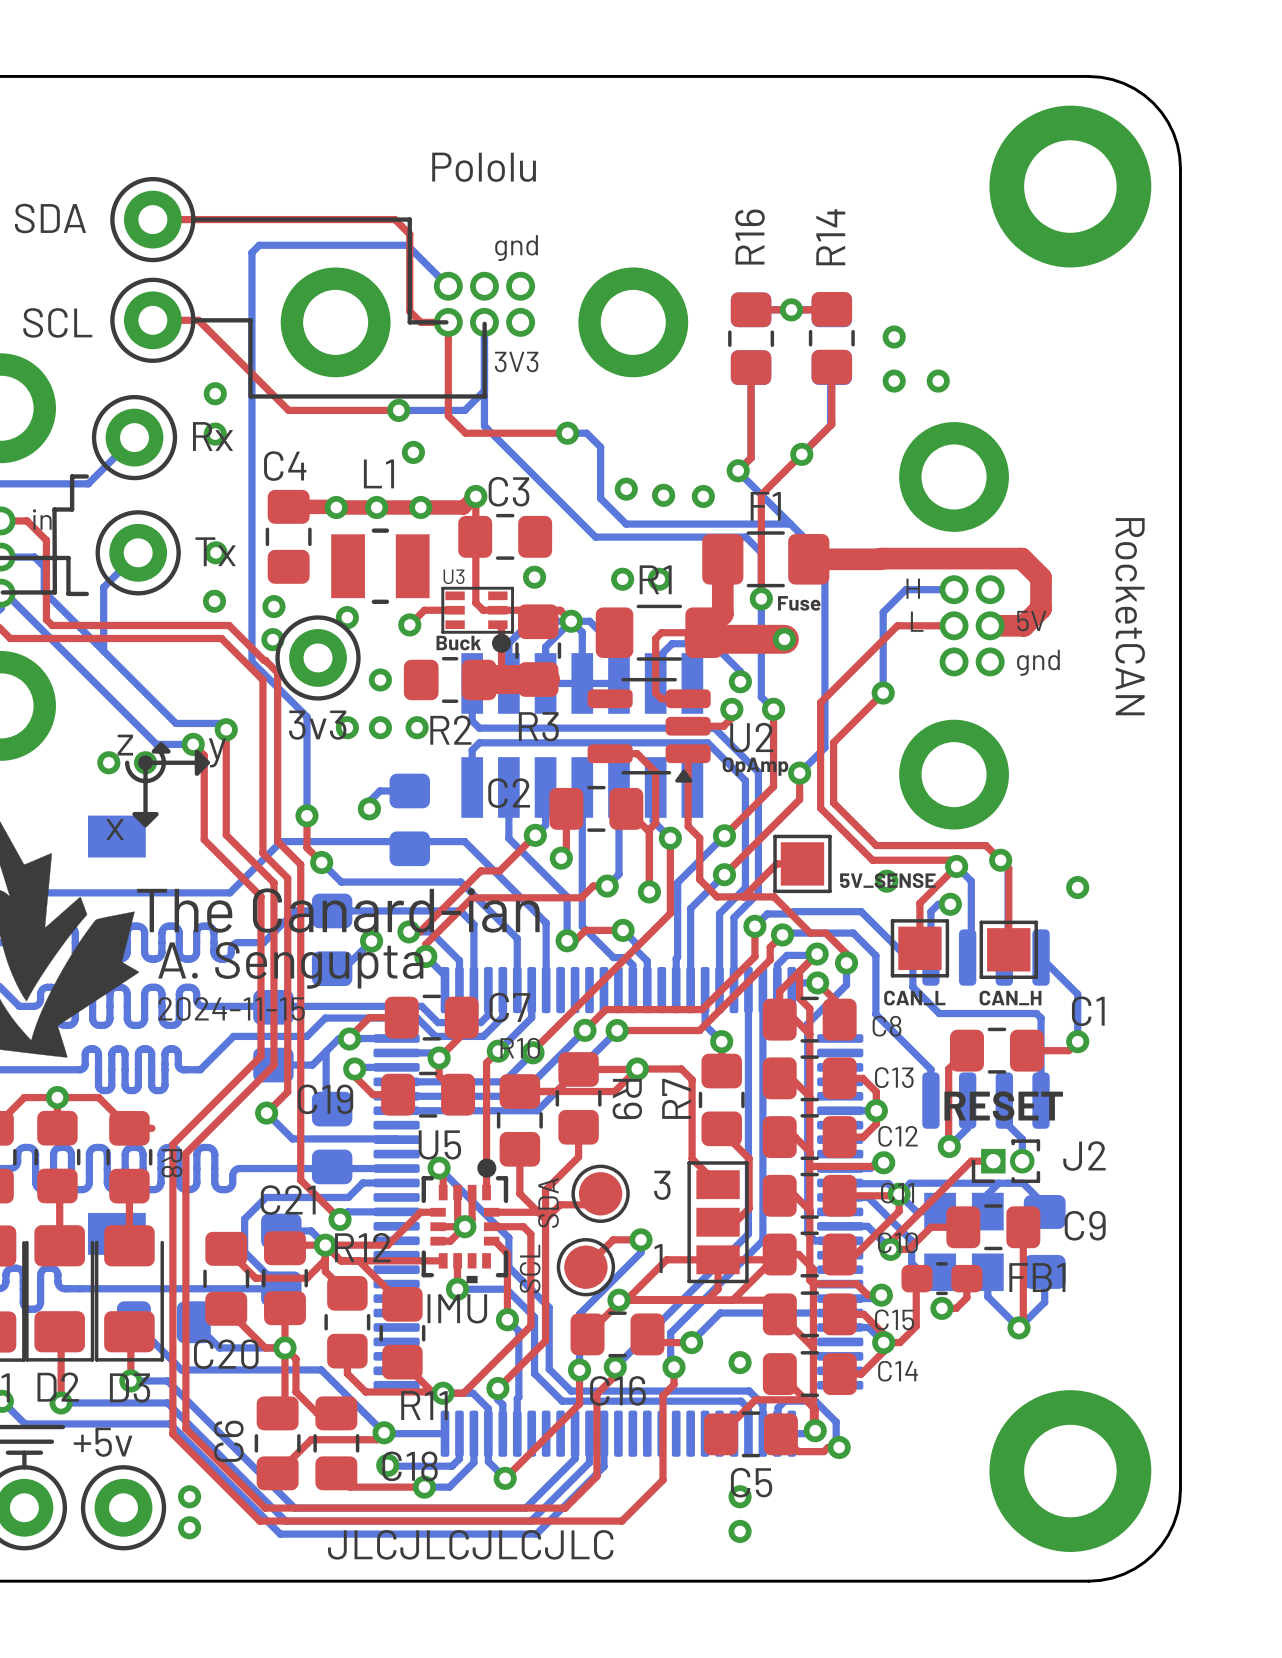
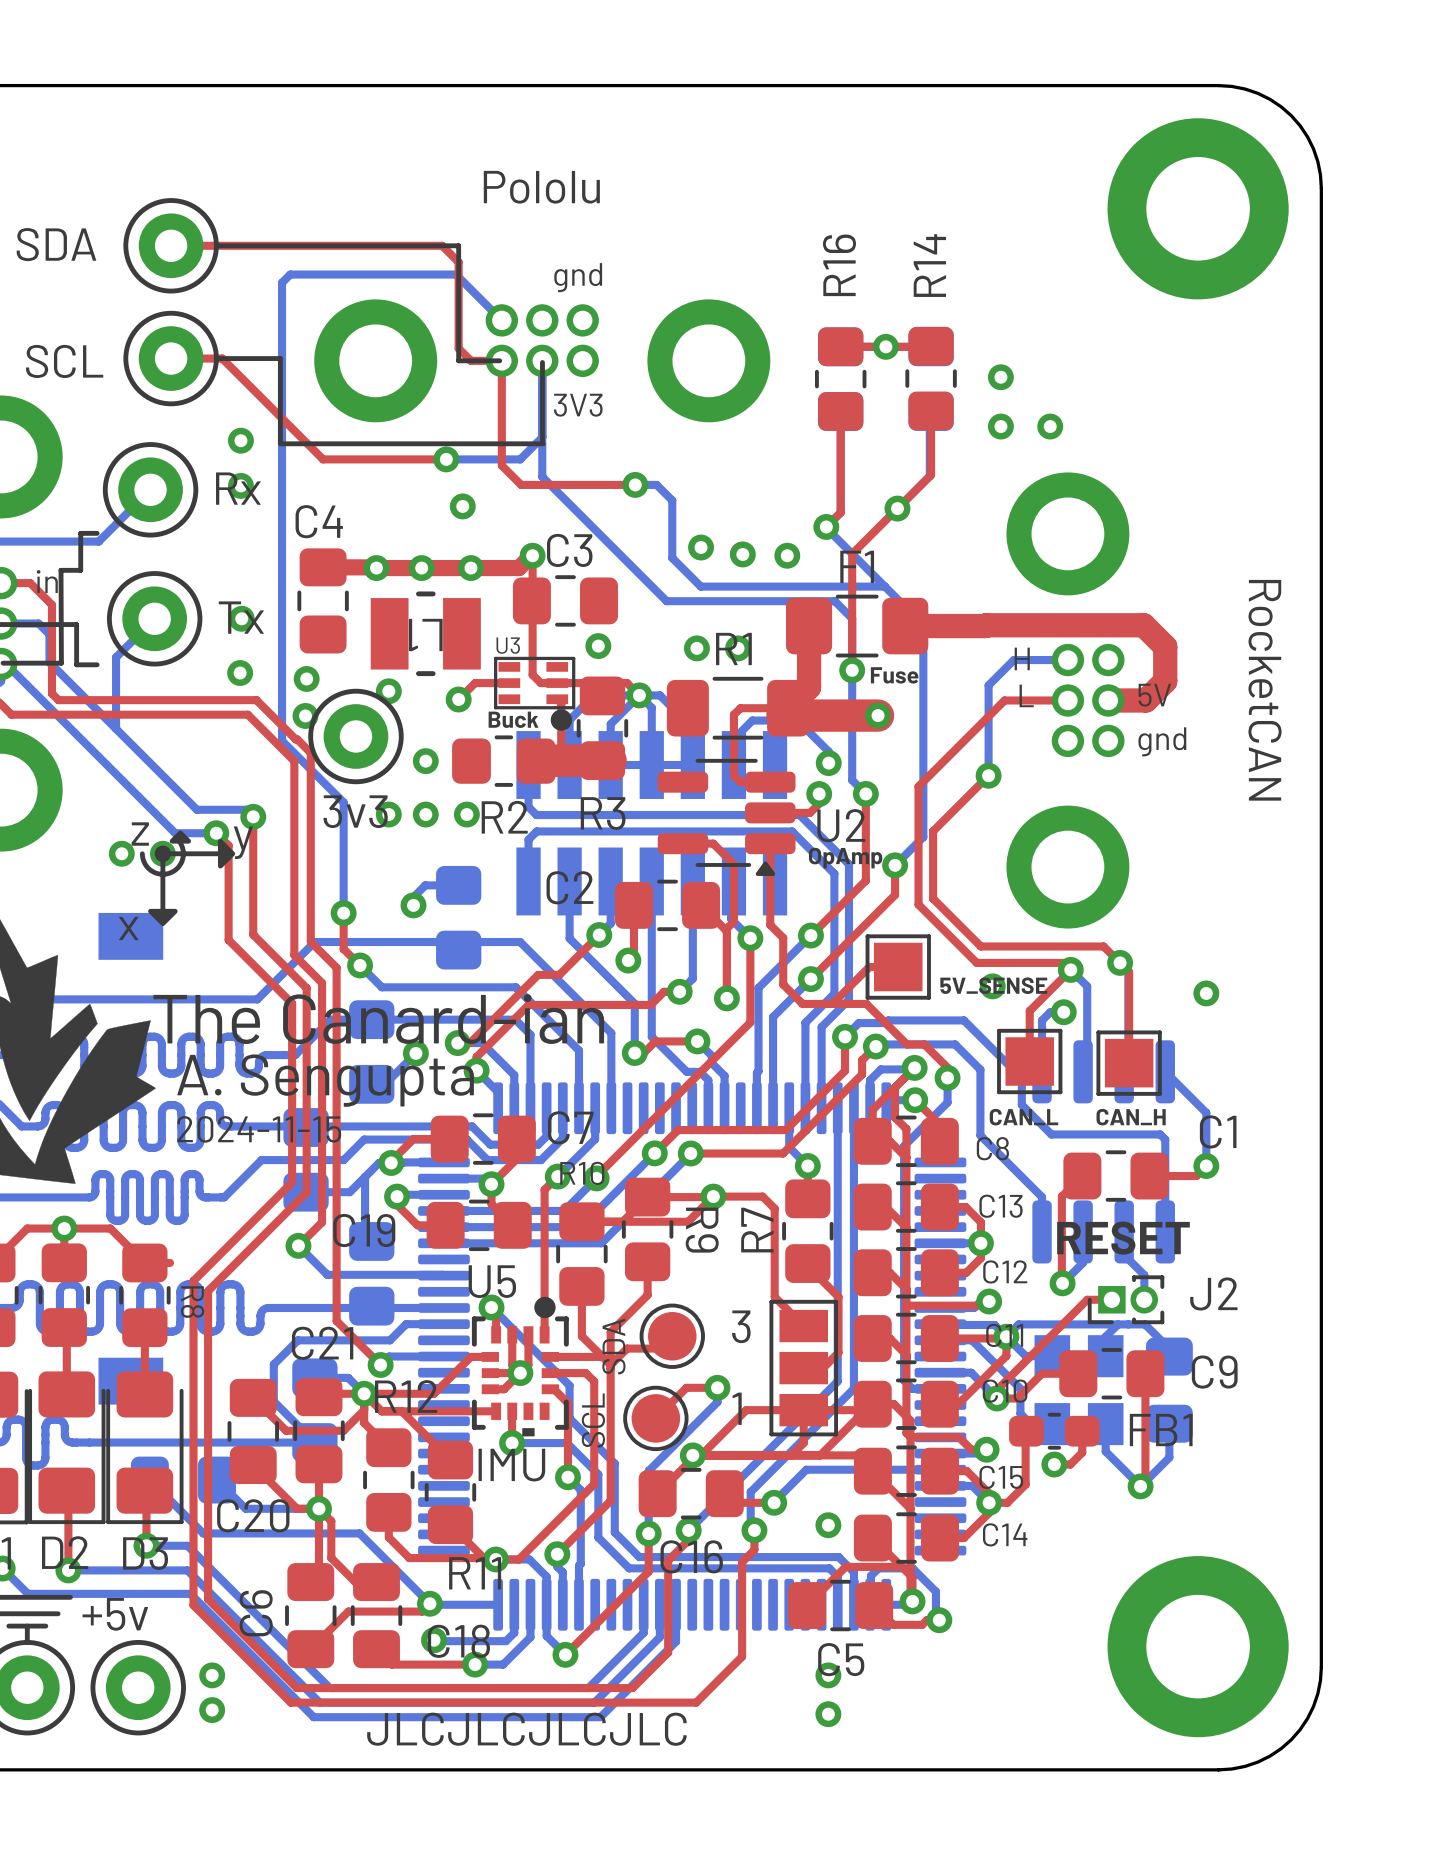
L1 name rotation: 0° (378, 473) -> 180° (425, 634)
L1 name position: L1 (378, 473) -> L1 (425, 634)

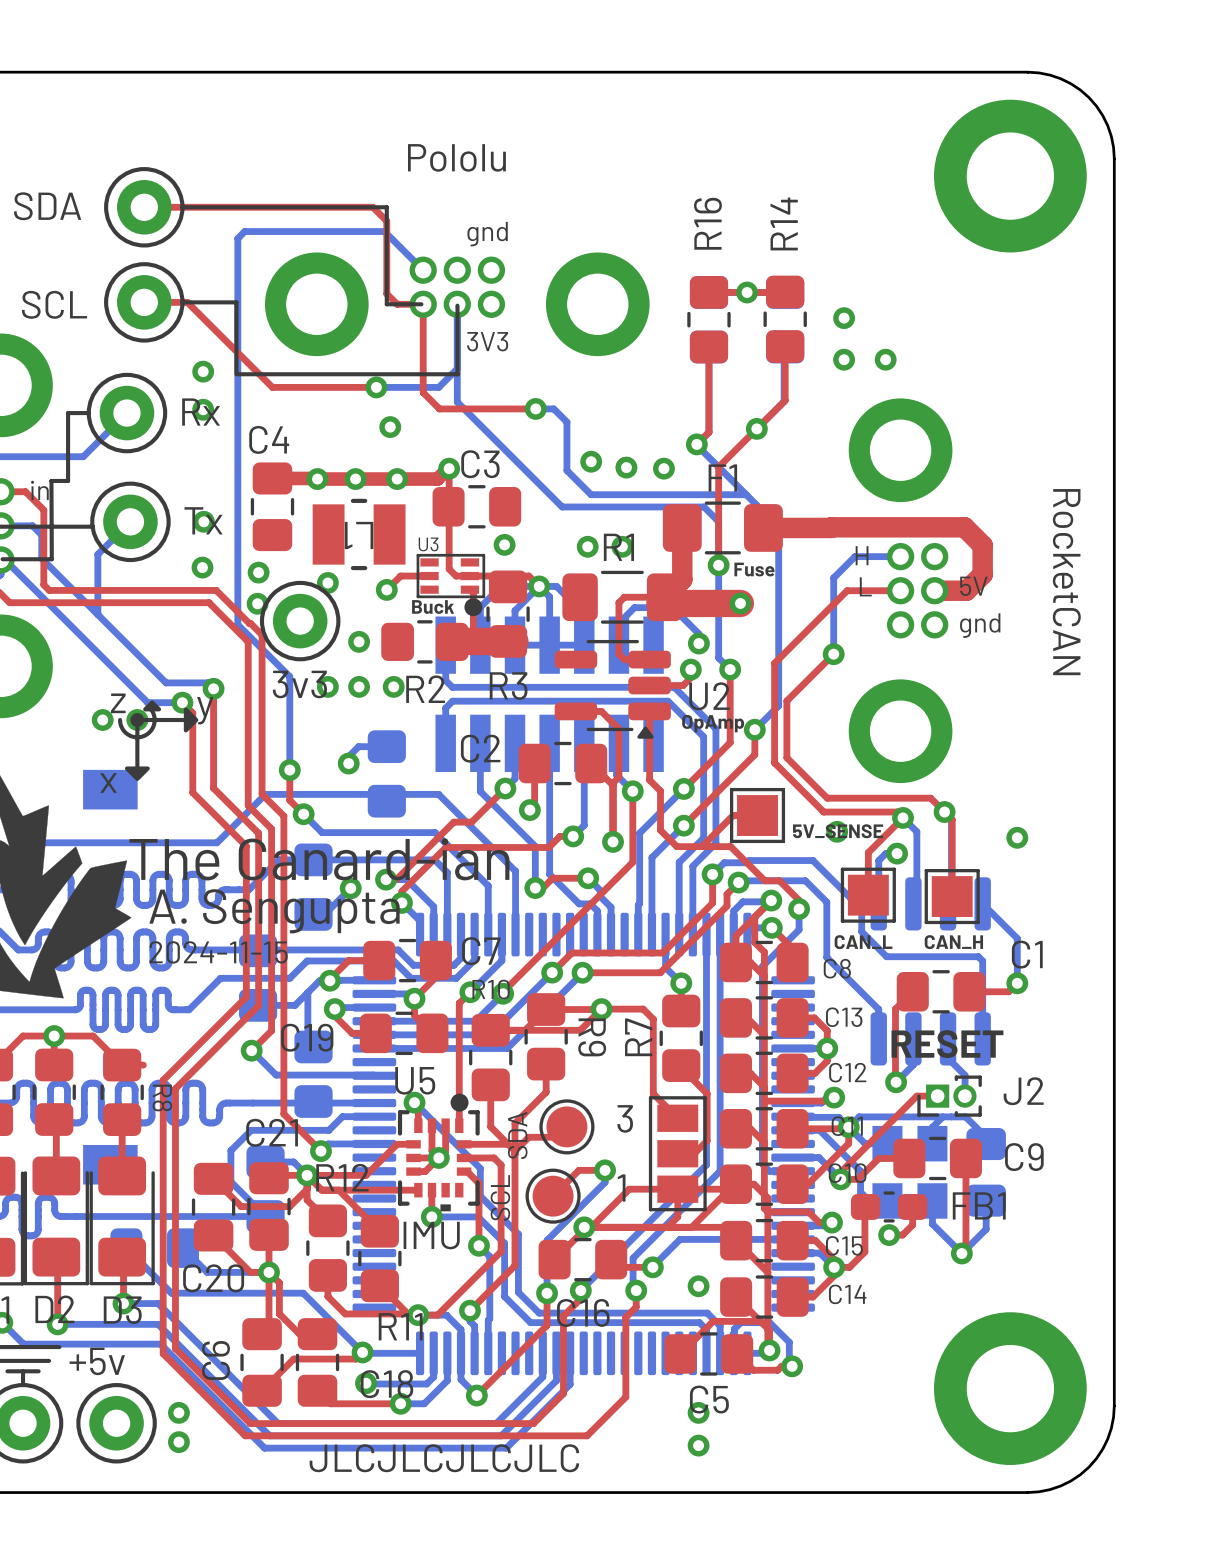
line: (80, 533) (97, 533) -> (68, 449) (68, 413) (88, 413)
line: (76, 624) (76, 664) (97, 664) -> (64, 526) (93, 526)

